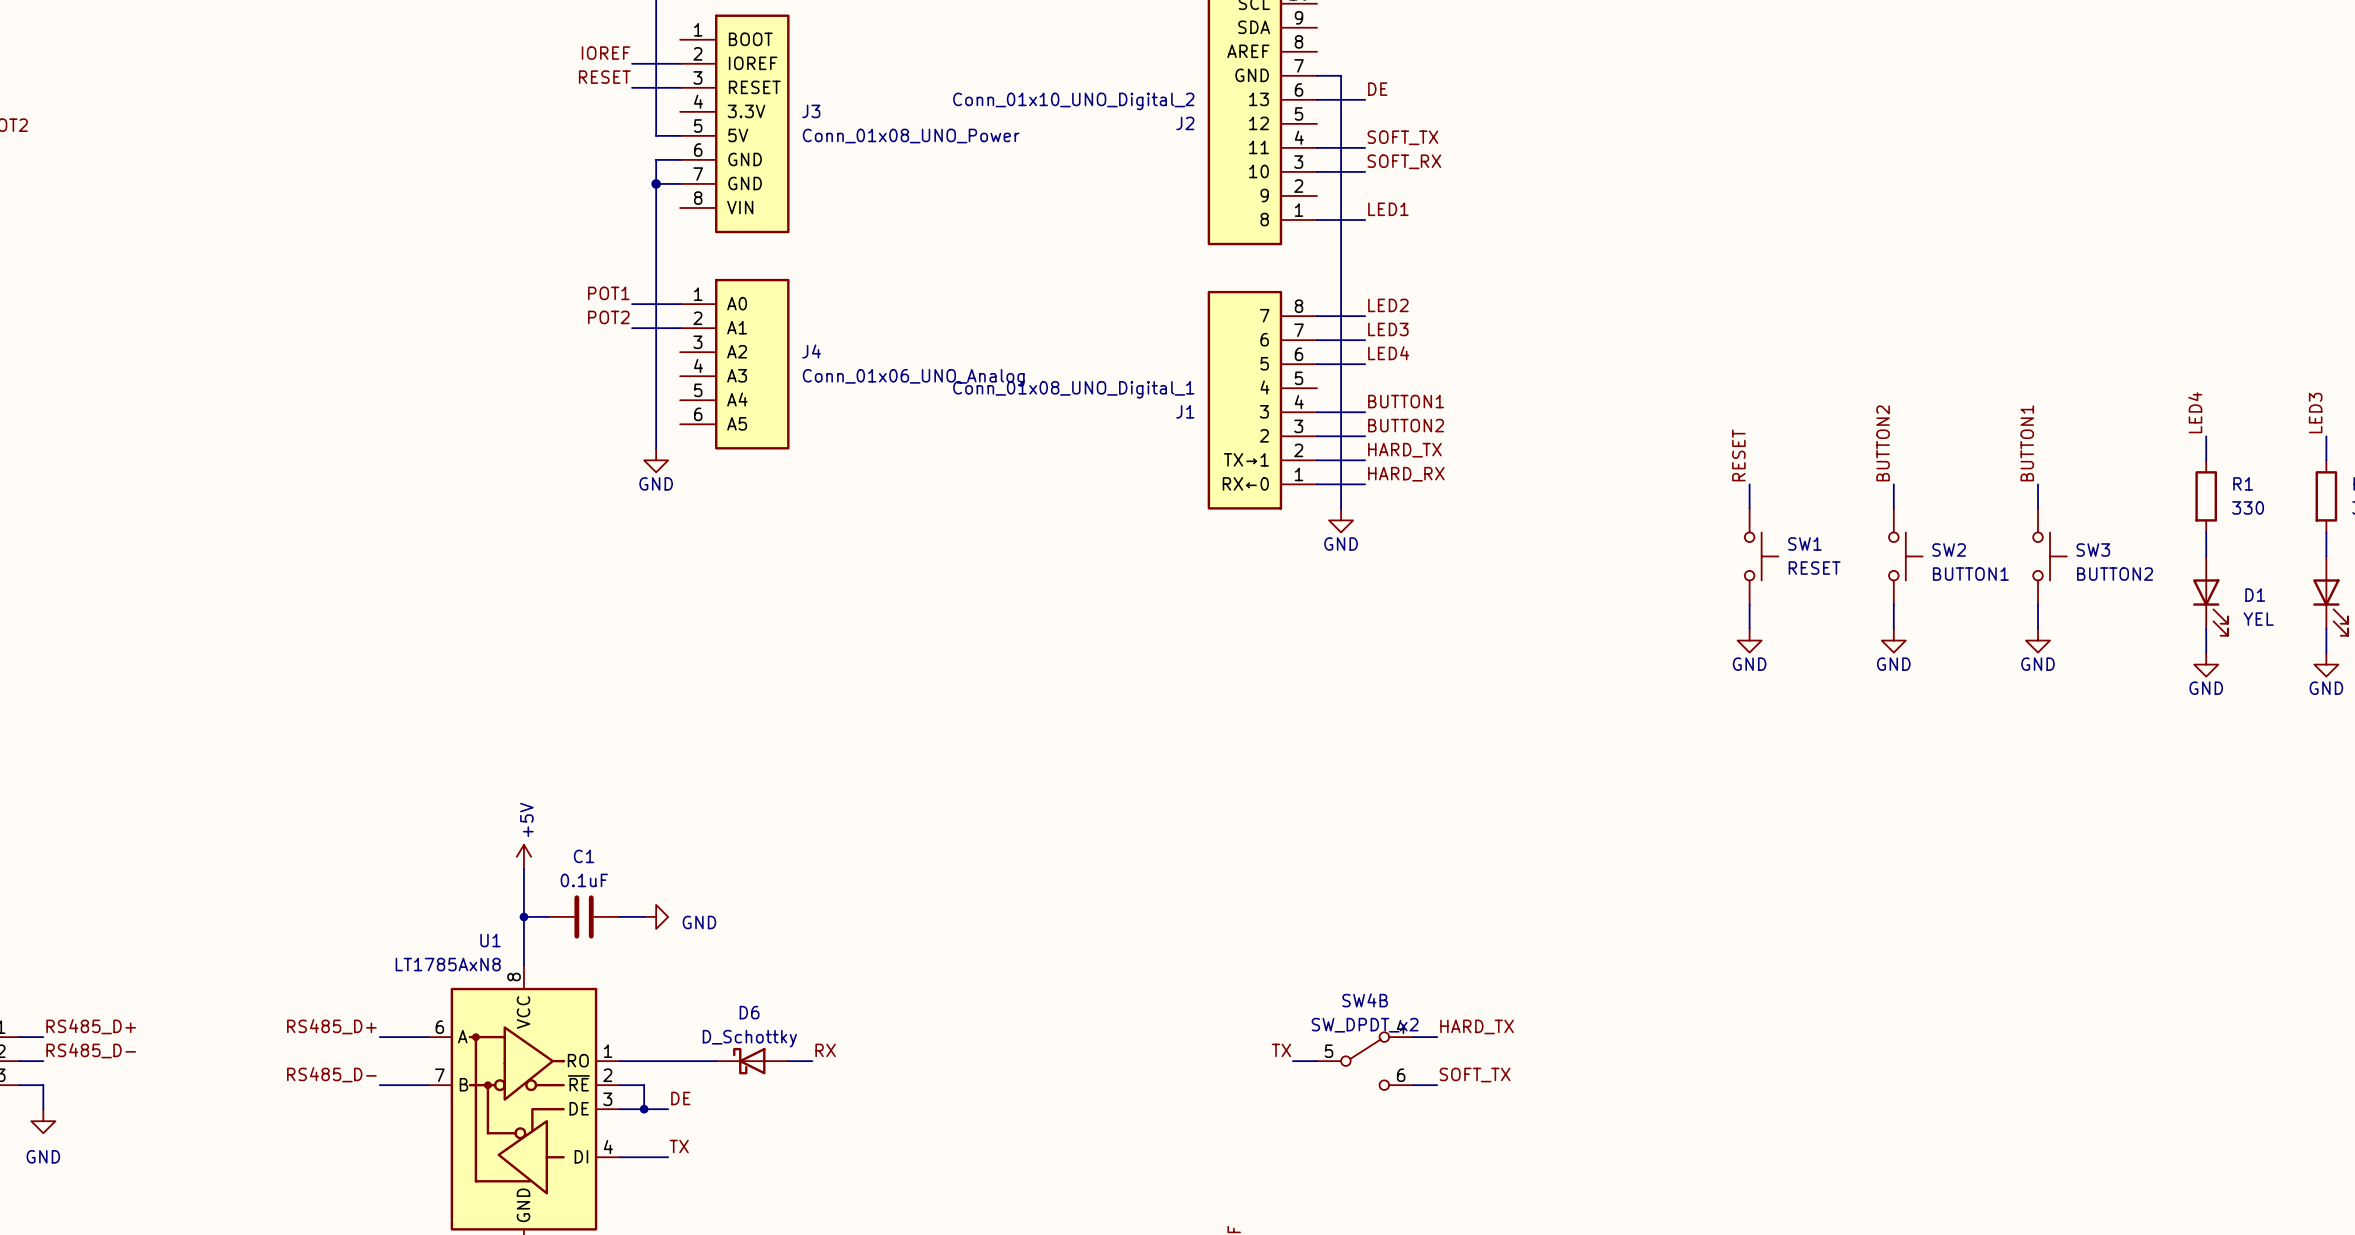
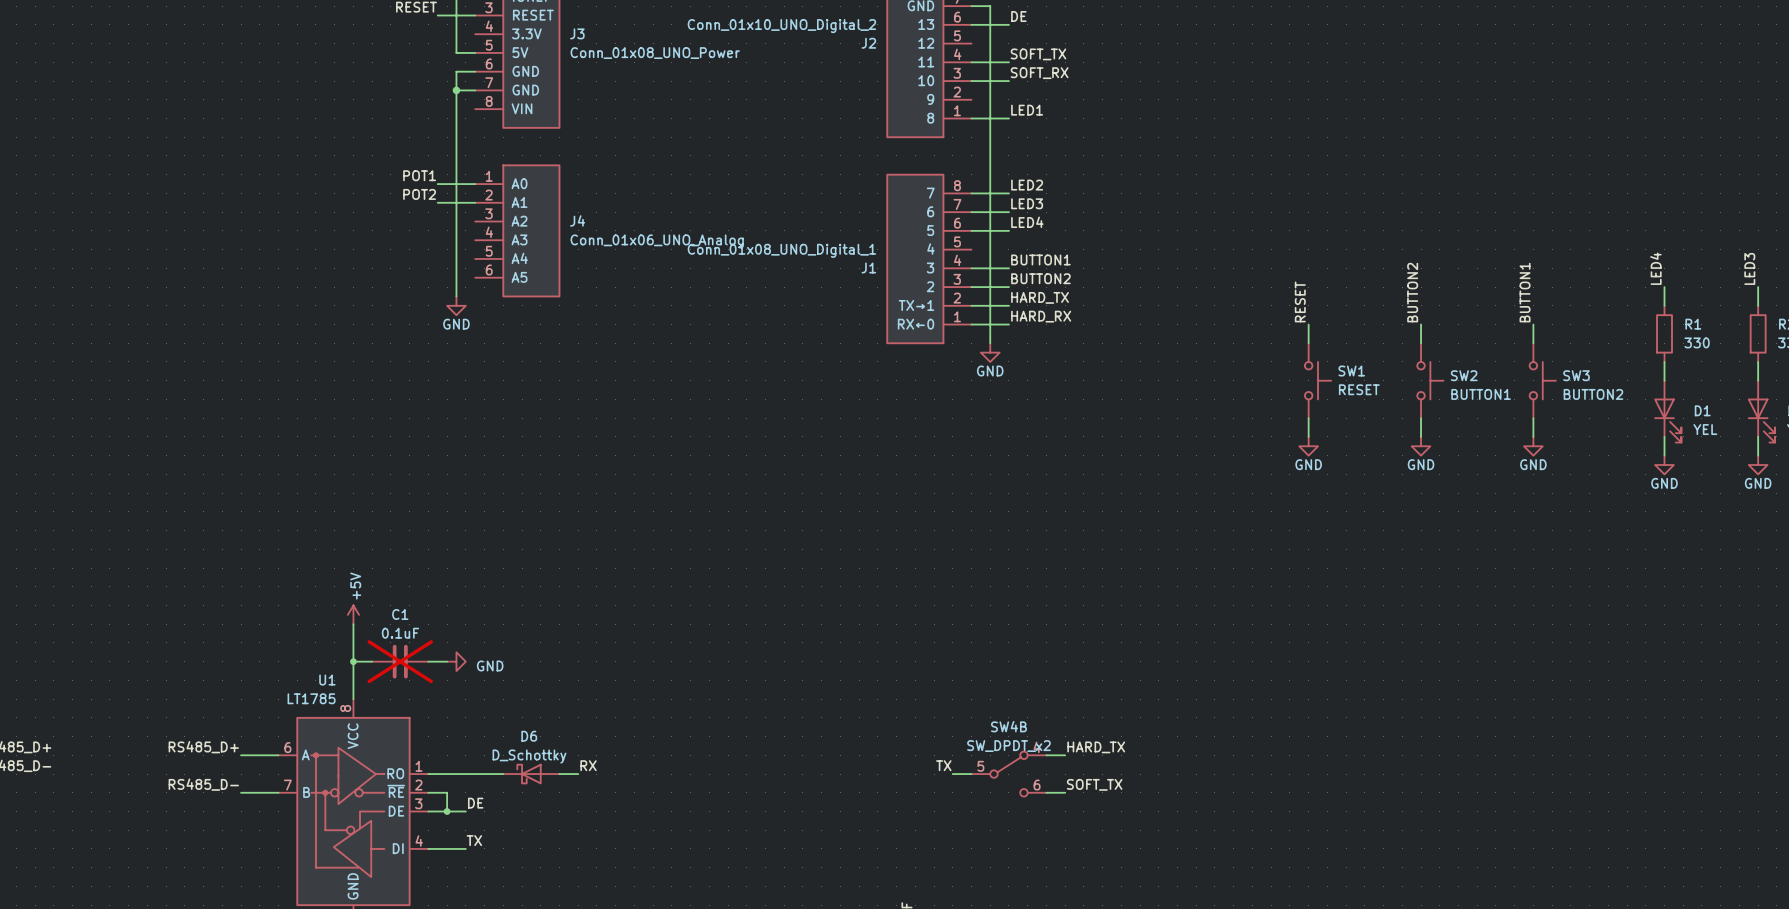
C1 do-not-place cross: none -> (400, 661)
U1 value: LT1785AxN8 (448, 964) -> LT1785 (311, 698)

